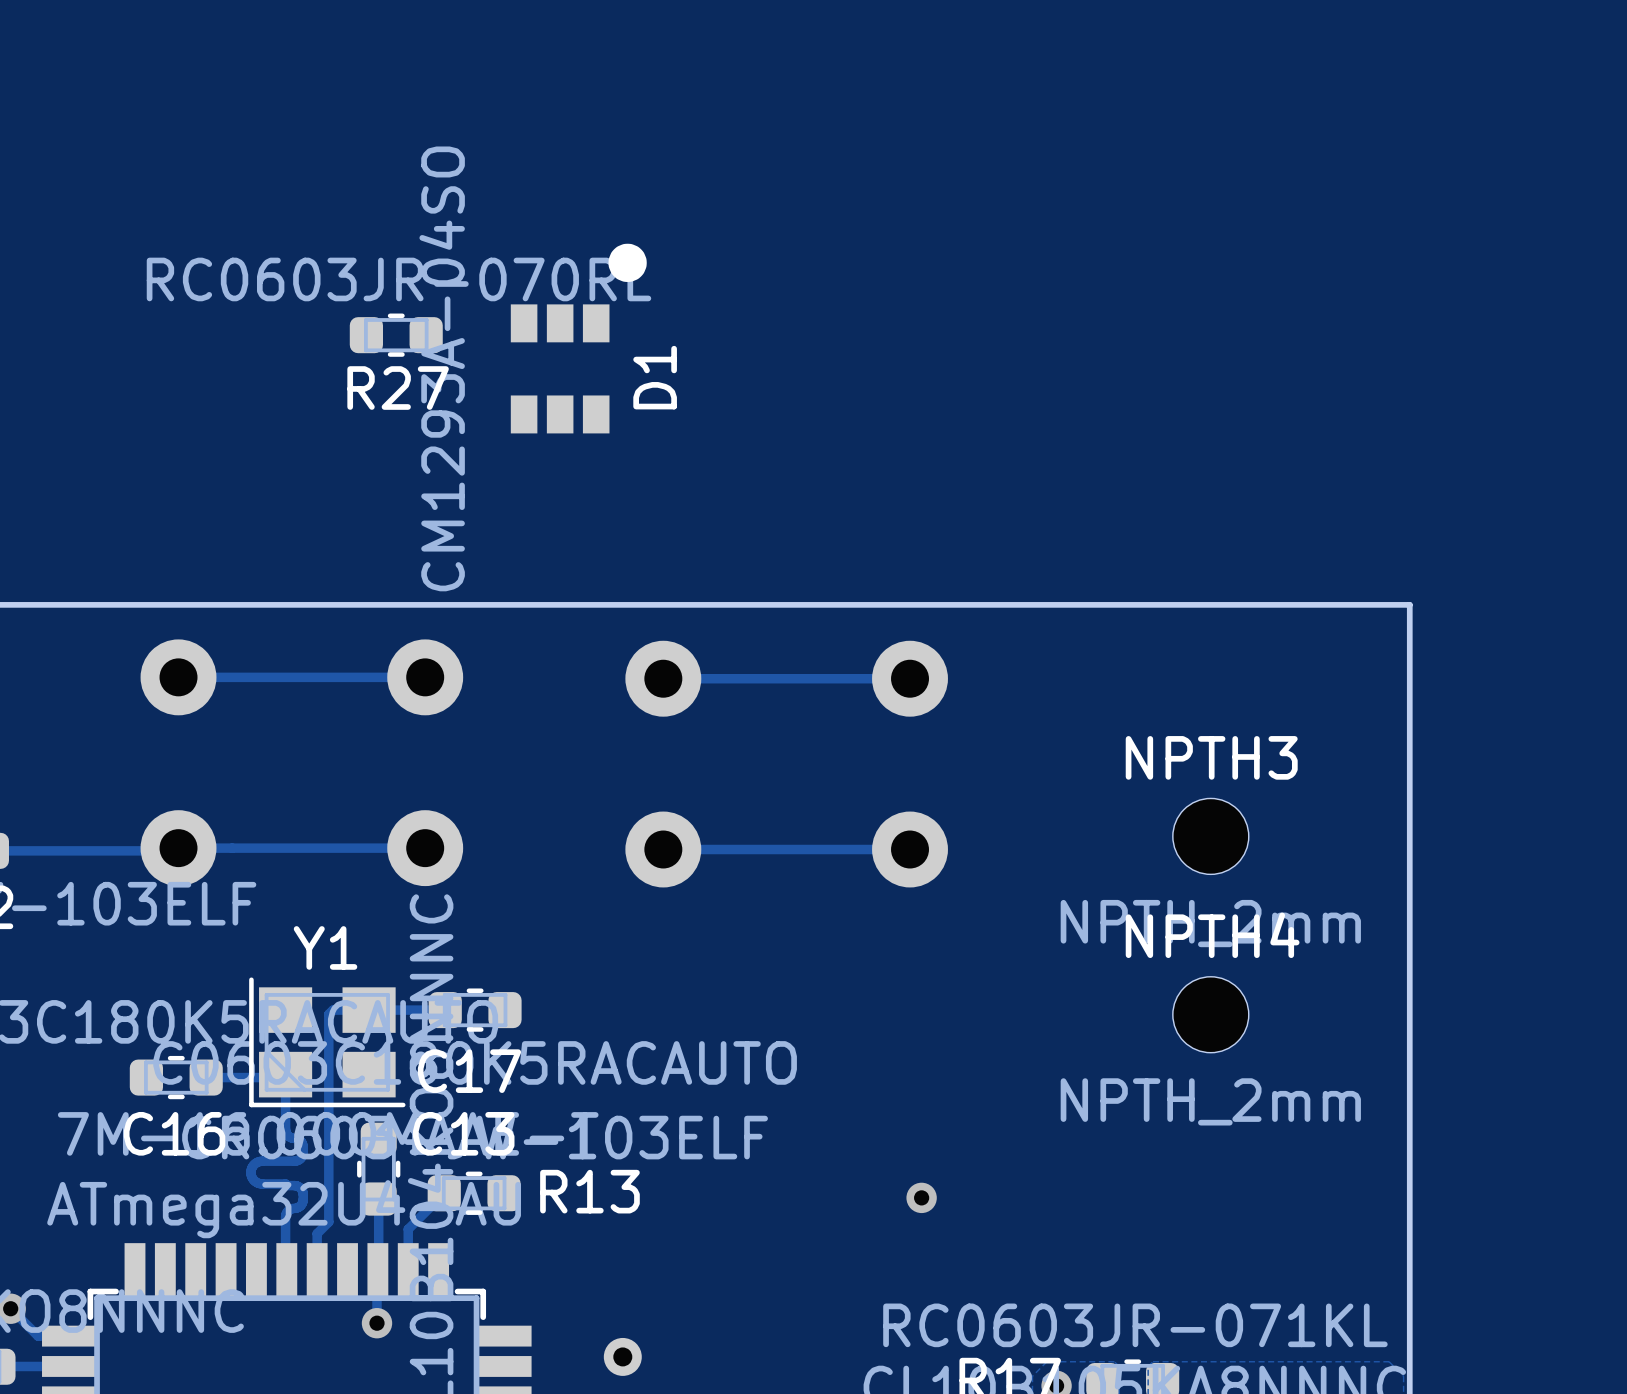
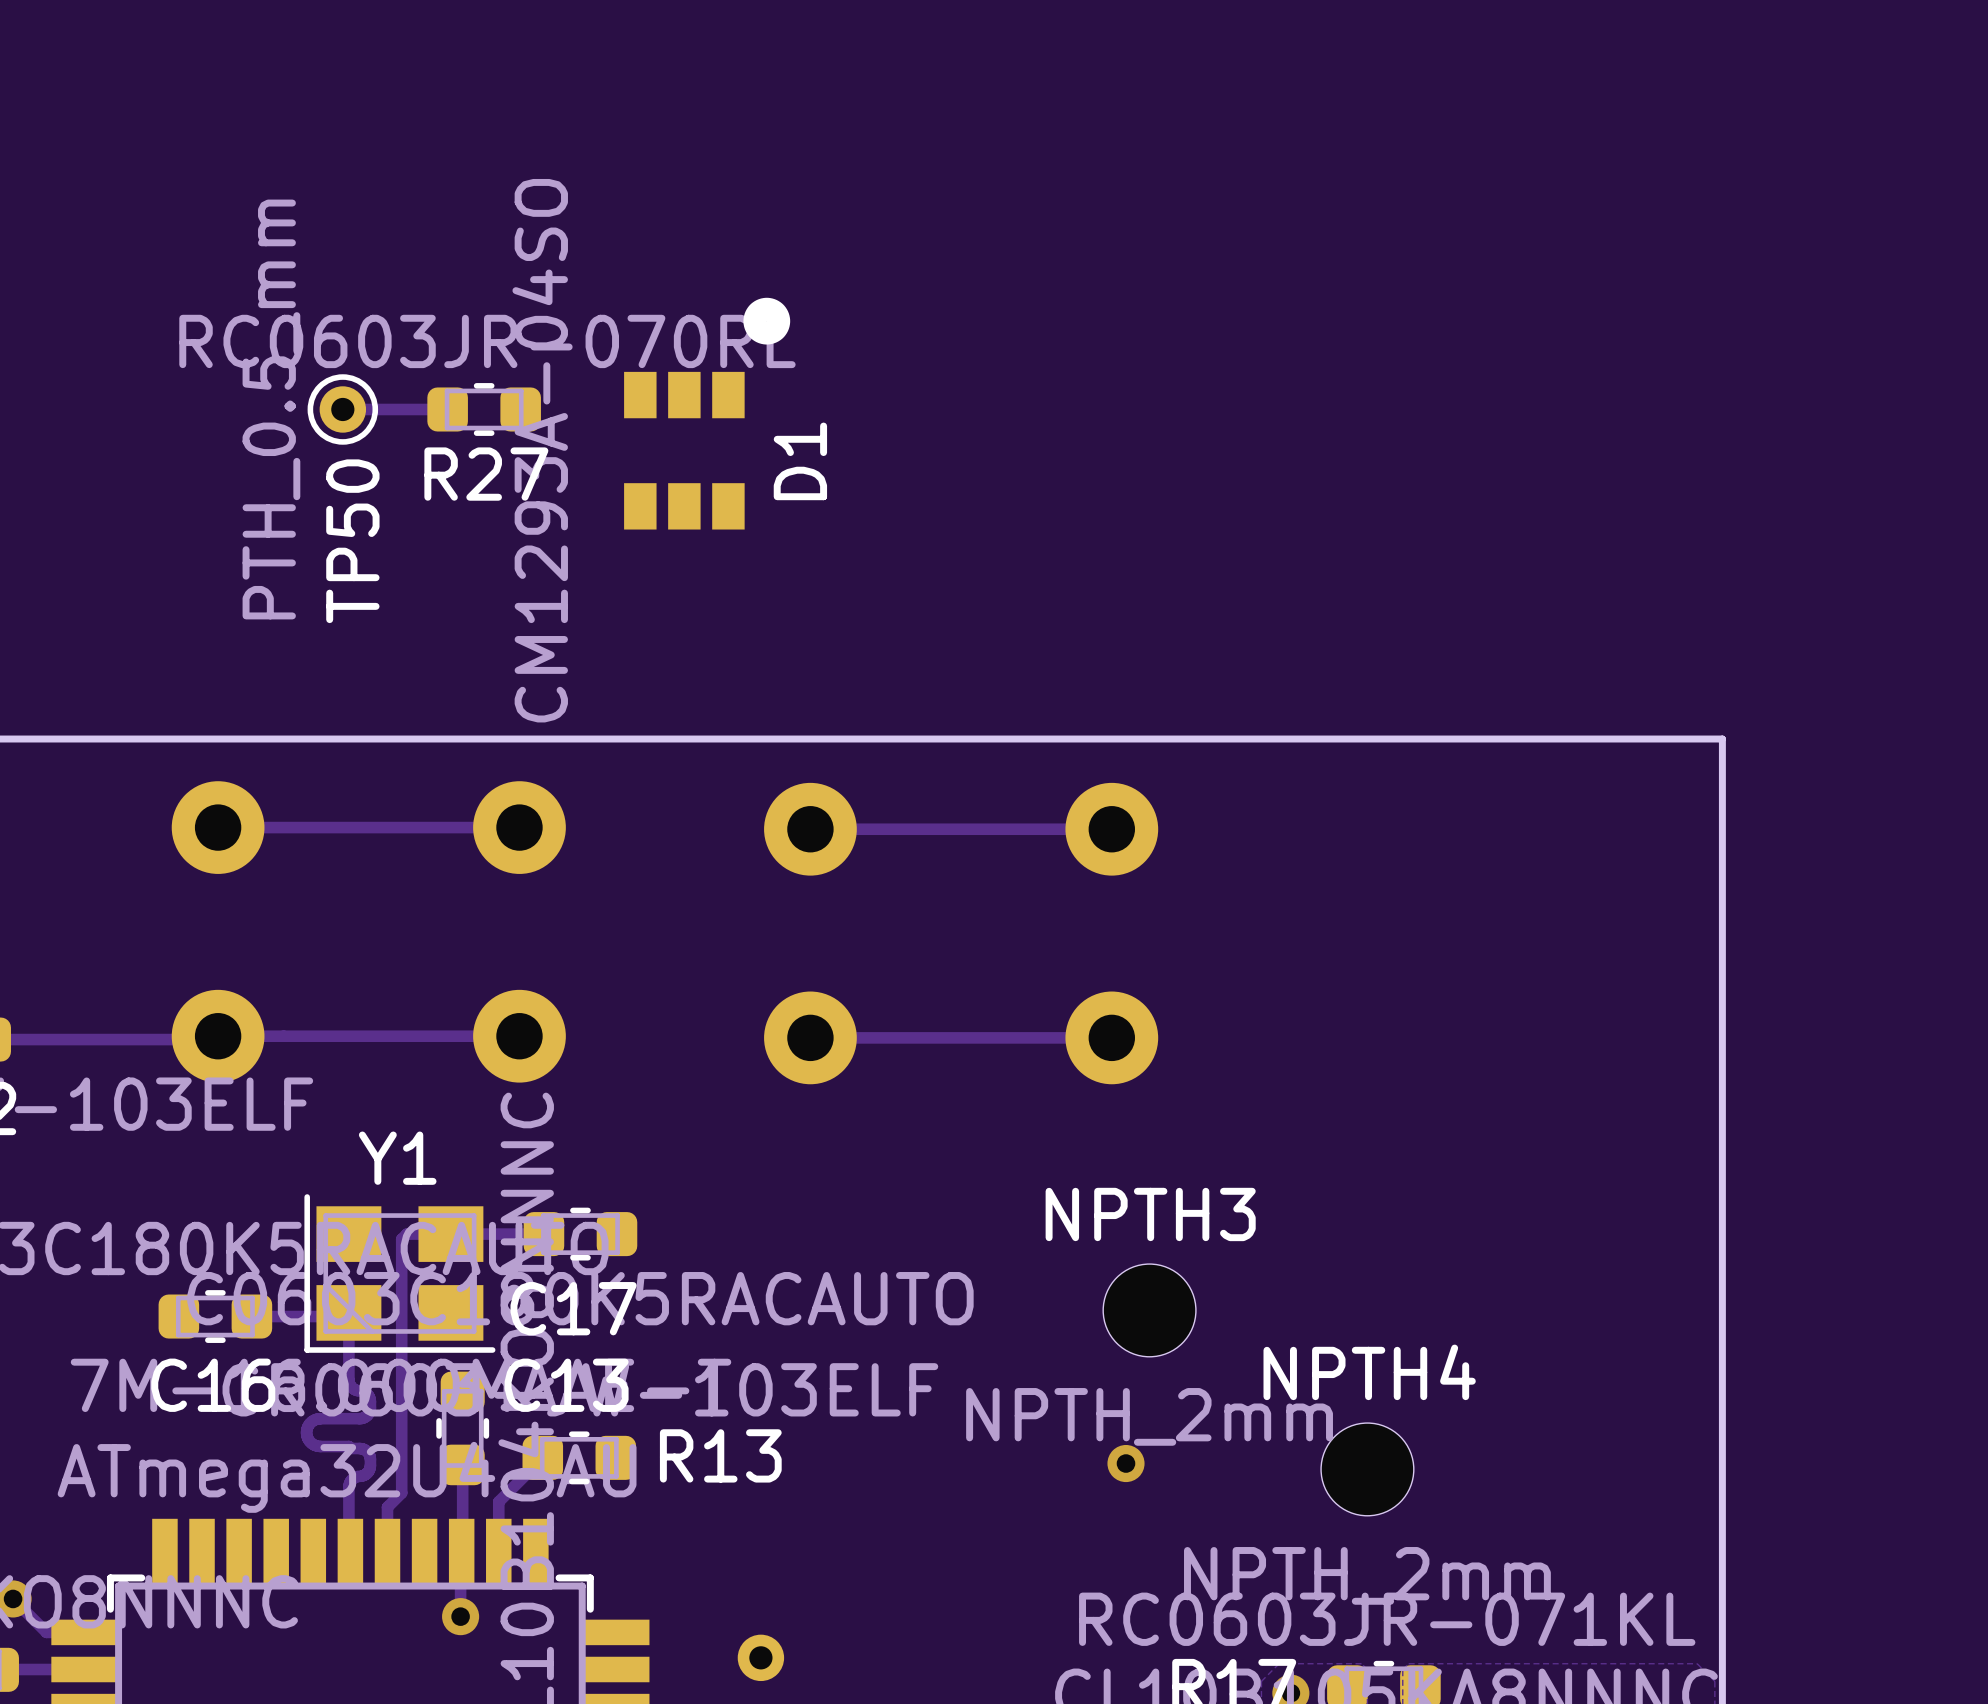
track: none -> (342, 409) (447, 409)
TP50: none -> PTH_0.5_mm (342, 409)
NPTH3 position: (1210, 836) -> (1149, 1310)
NPTH4 position: (1210, 1014) -> (1367, 1469)

